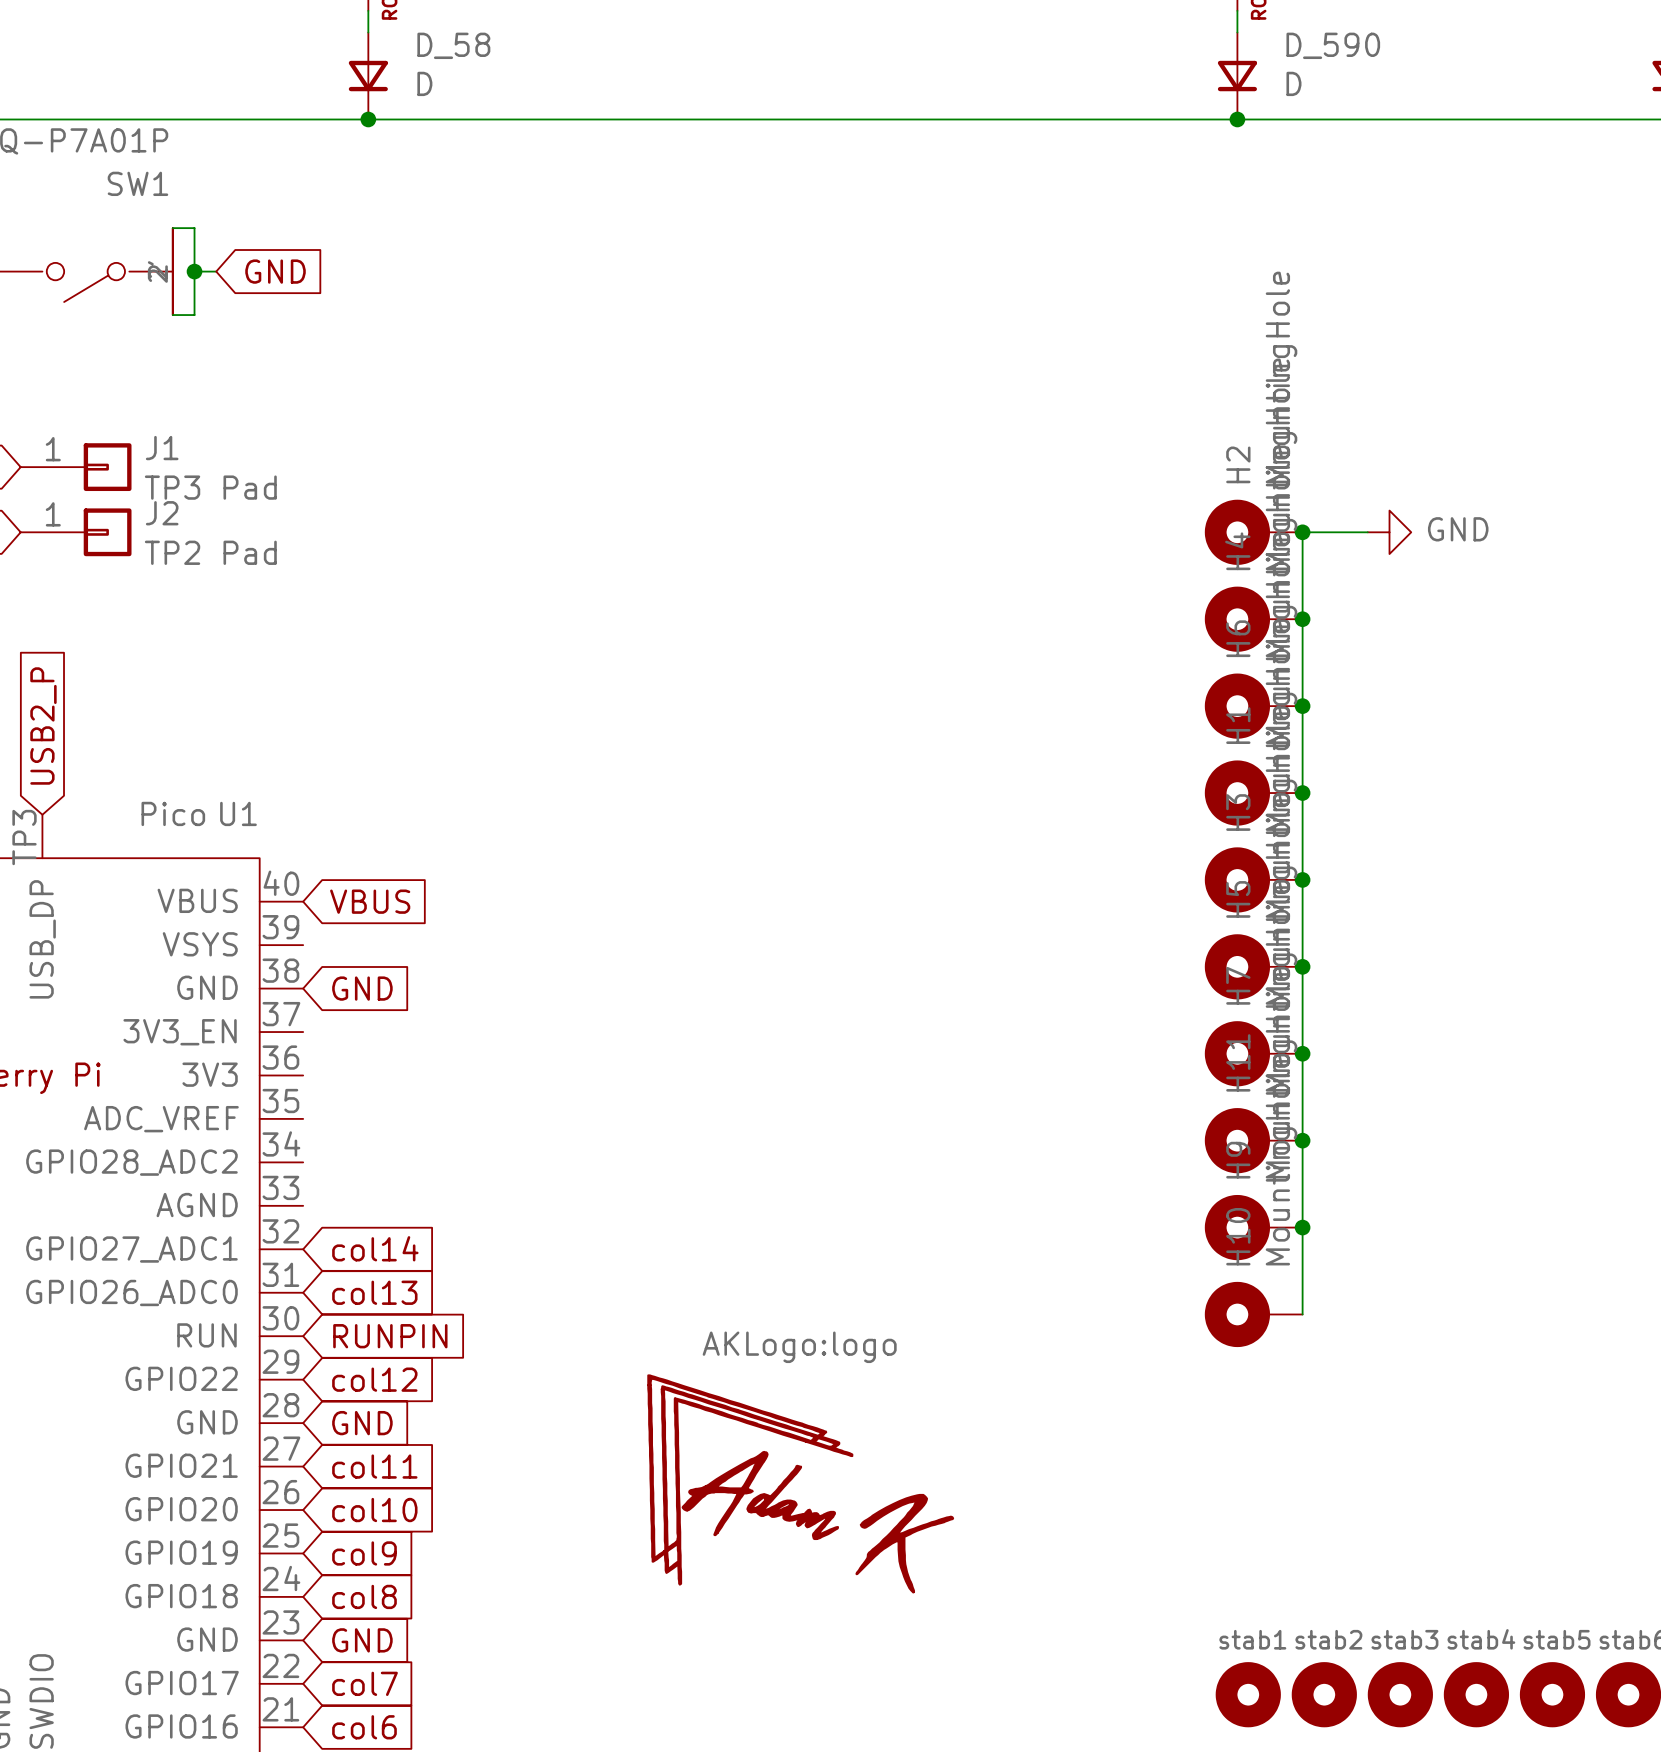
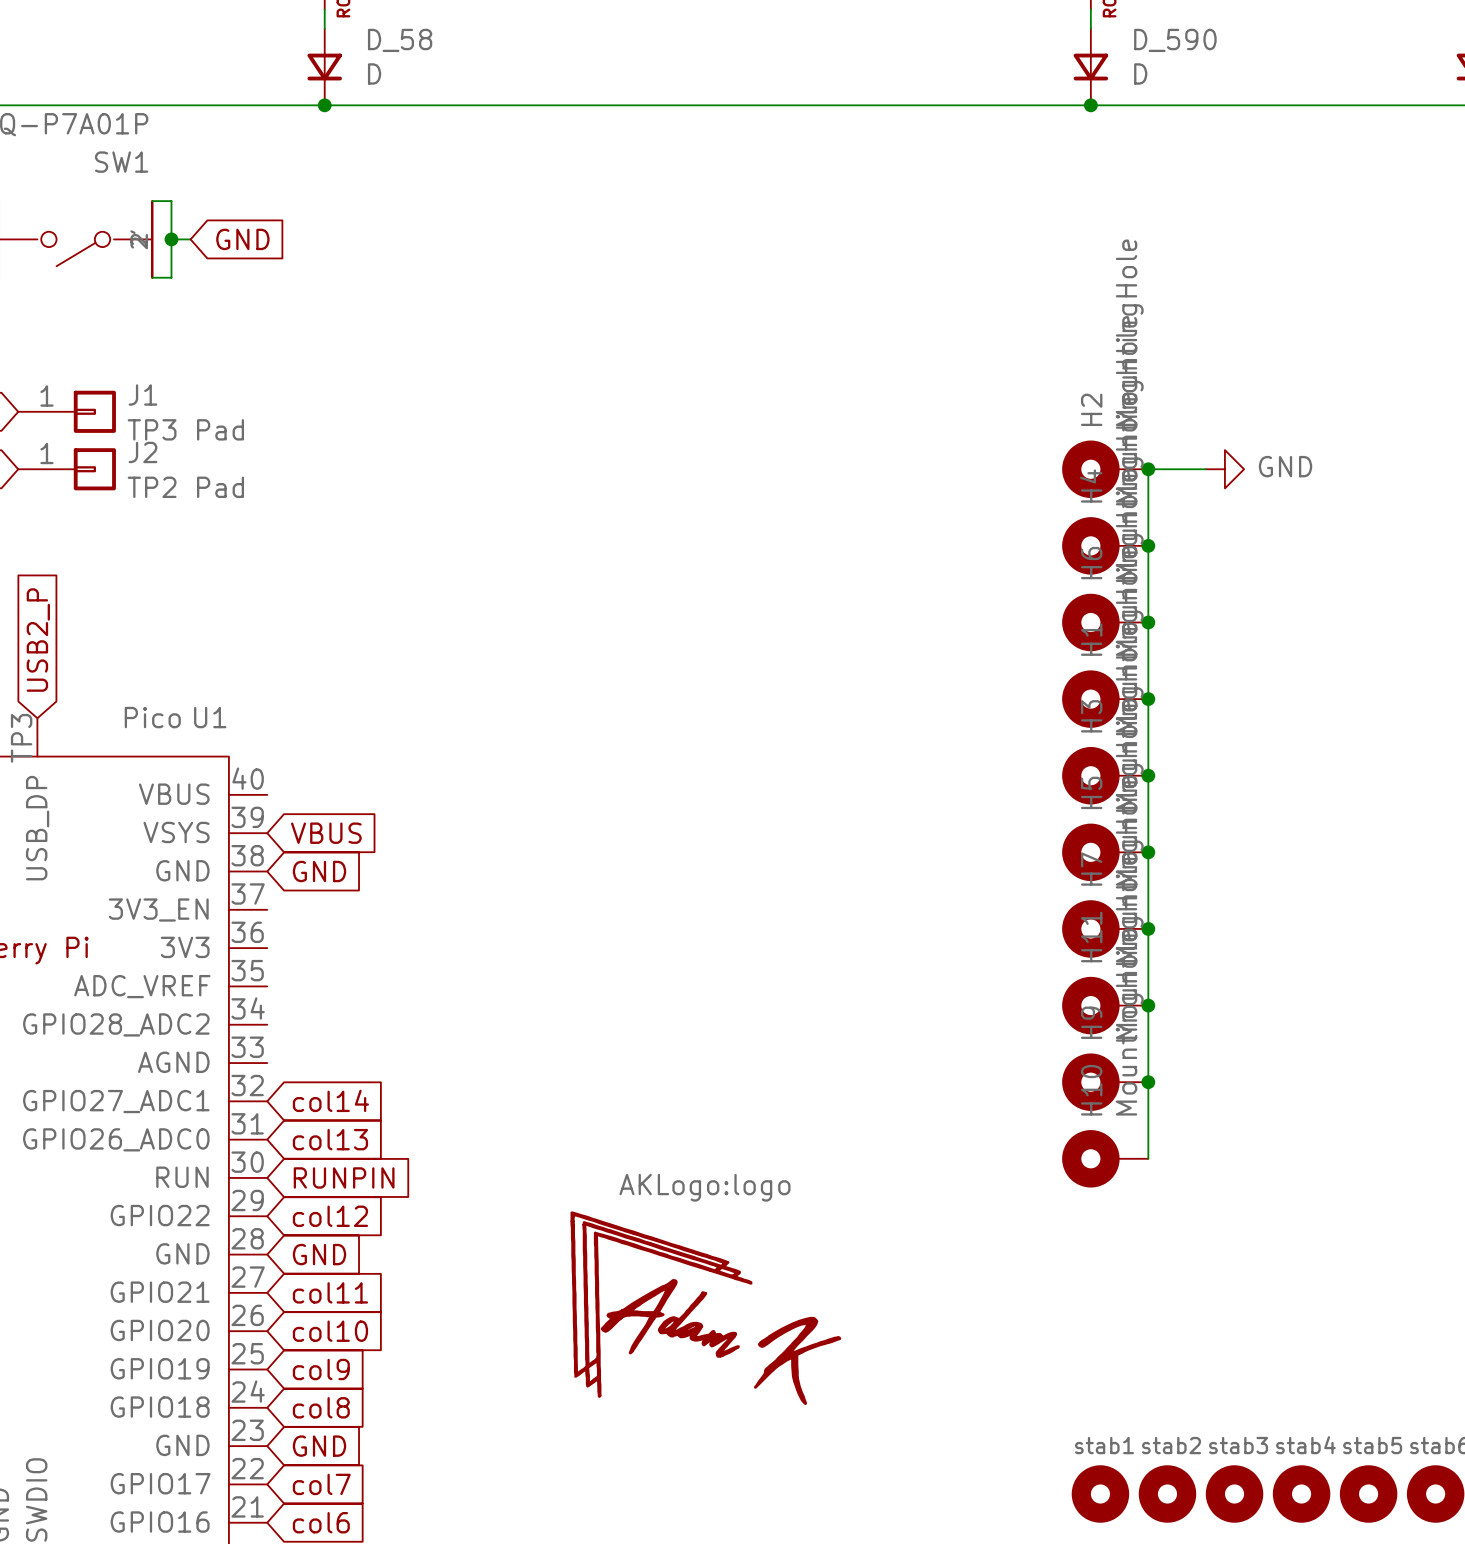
global label position: VBUS (370, 901) -> VBUS (326, 833)

